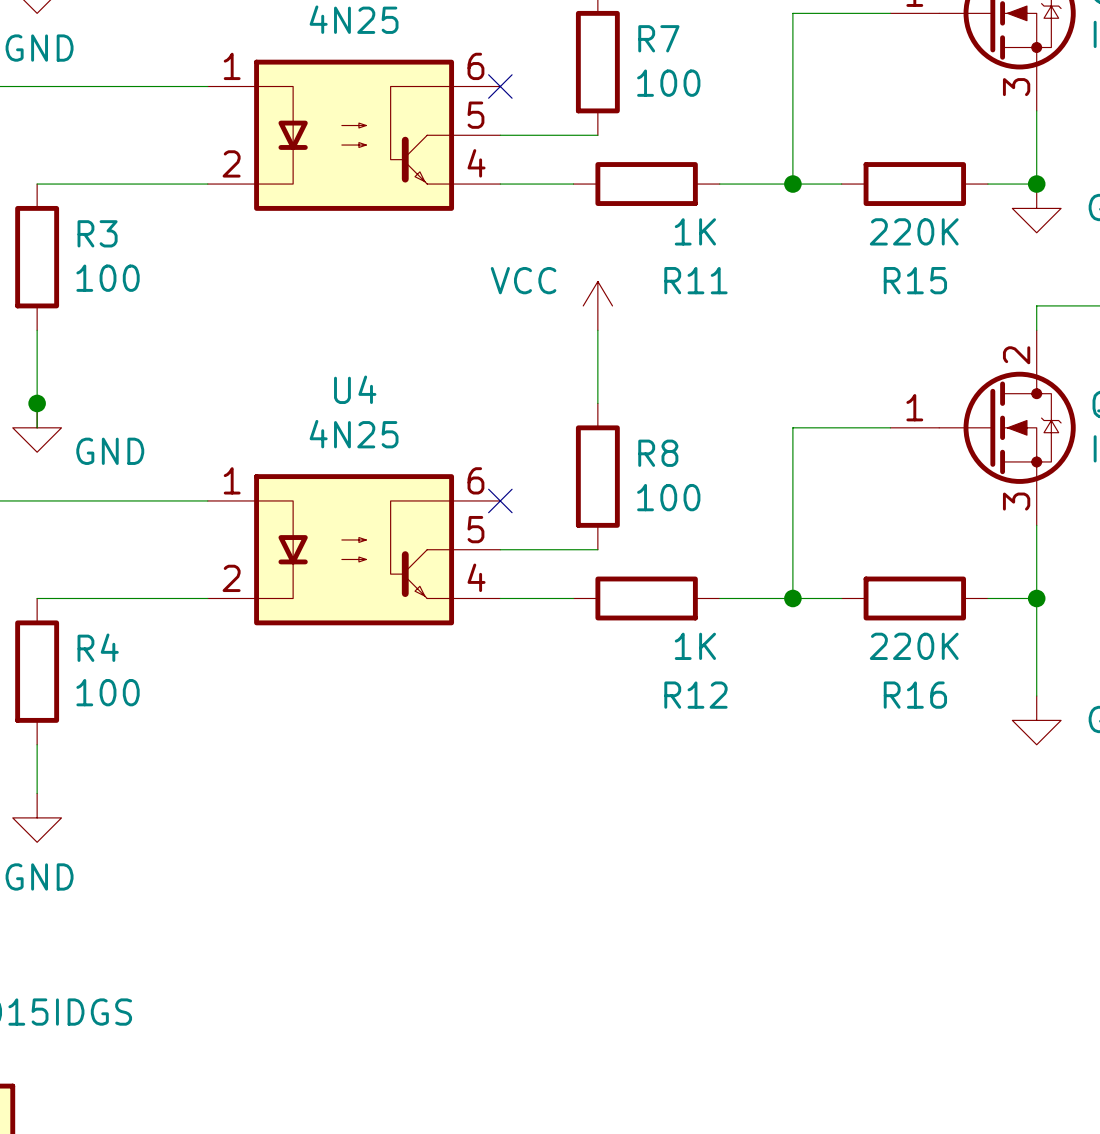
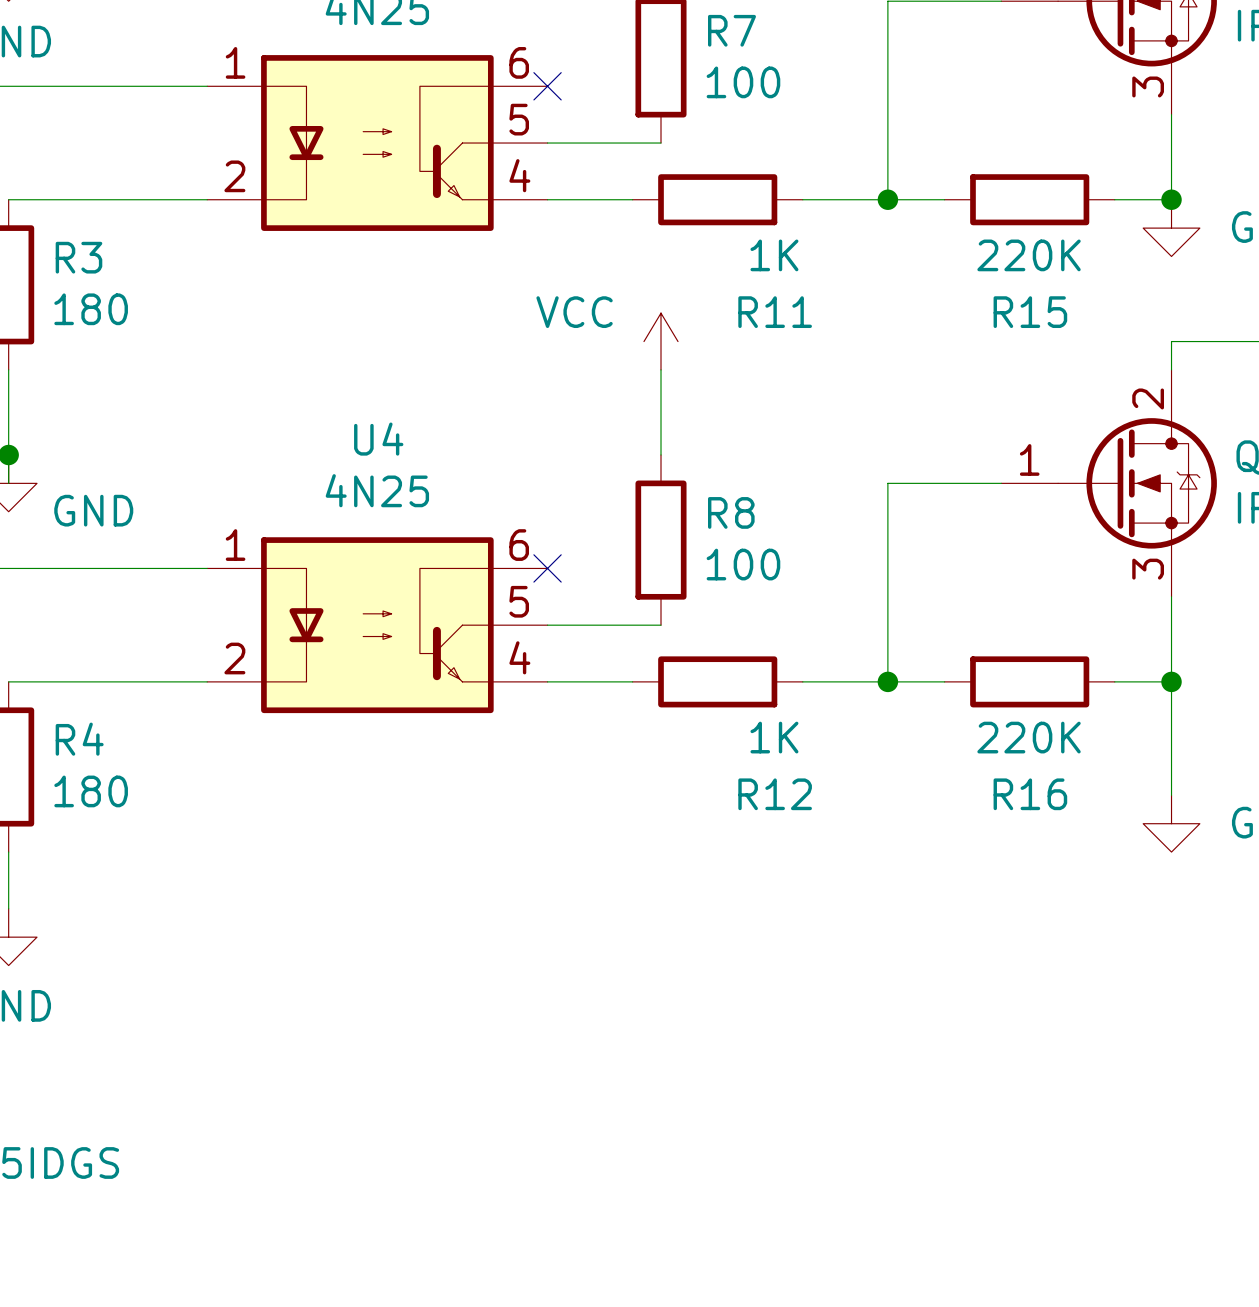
R3 value: 100 (108, 278) -> 180 (91, 309)
R4 value: 100 (108, 692) -> 180 (91, 791)

